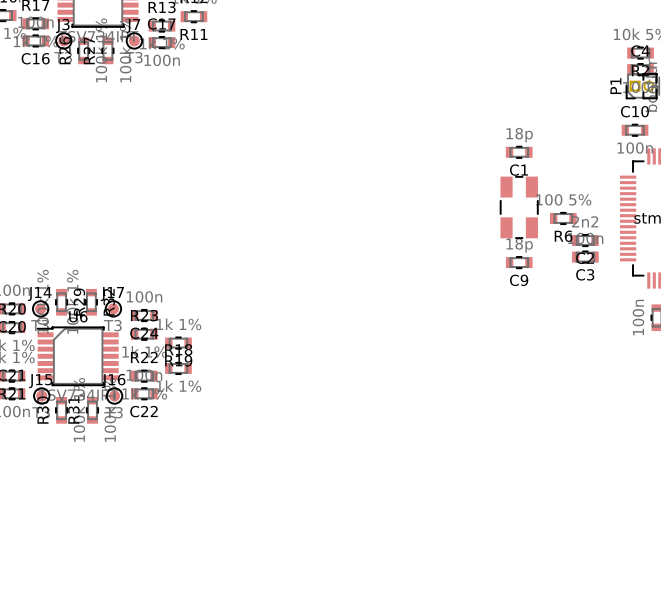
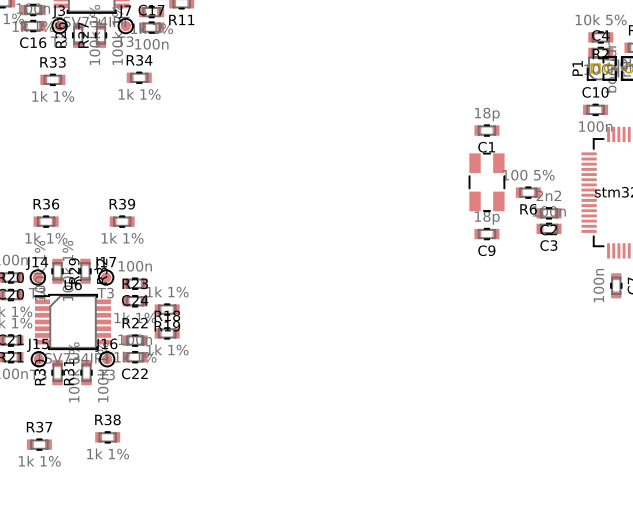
R34: none -> 1k 1% (139, 77)
R33: none -> 1k 1% (52, 79)
R36: none -> 1k 1% (46, 221)
R39: none -> 1k 1% (122, 221)
R38: none -> 1k 1% (107, 437)
R37: none -> 1k 1% (39, 444)

